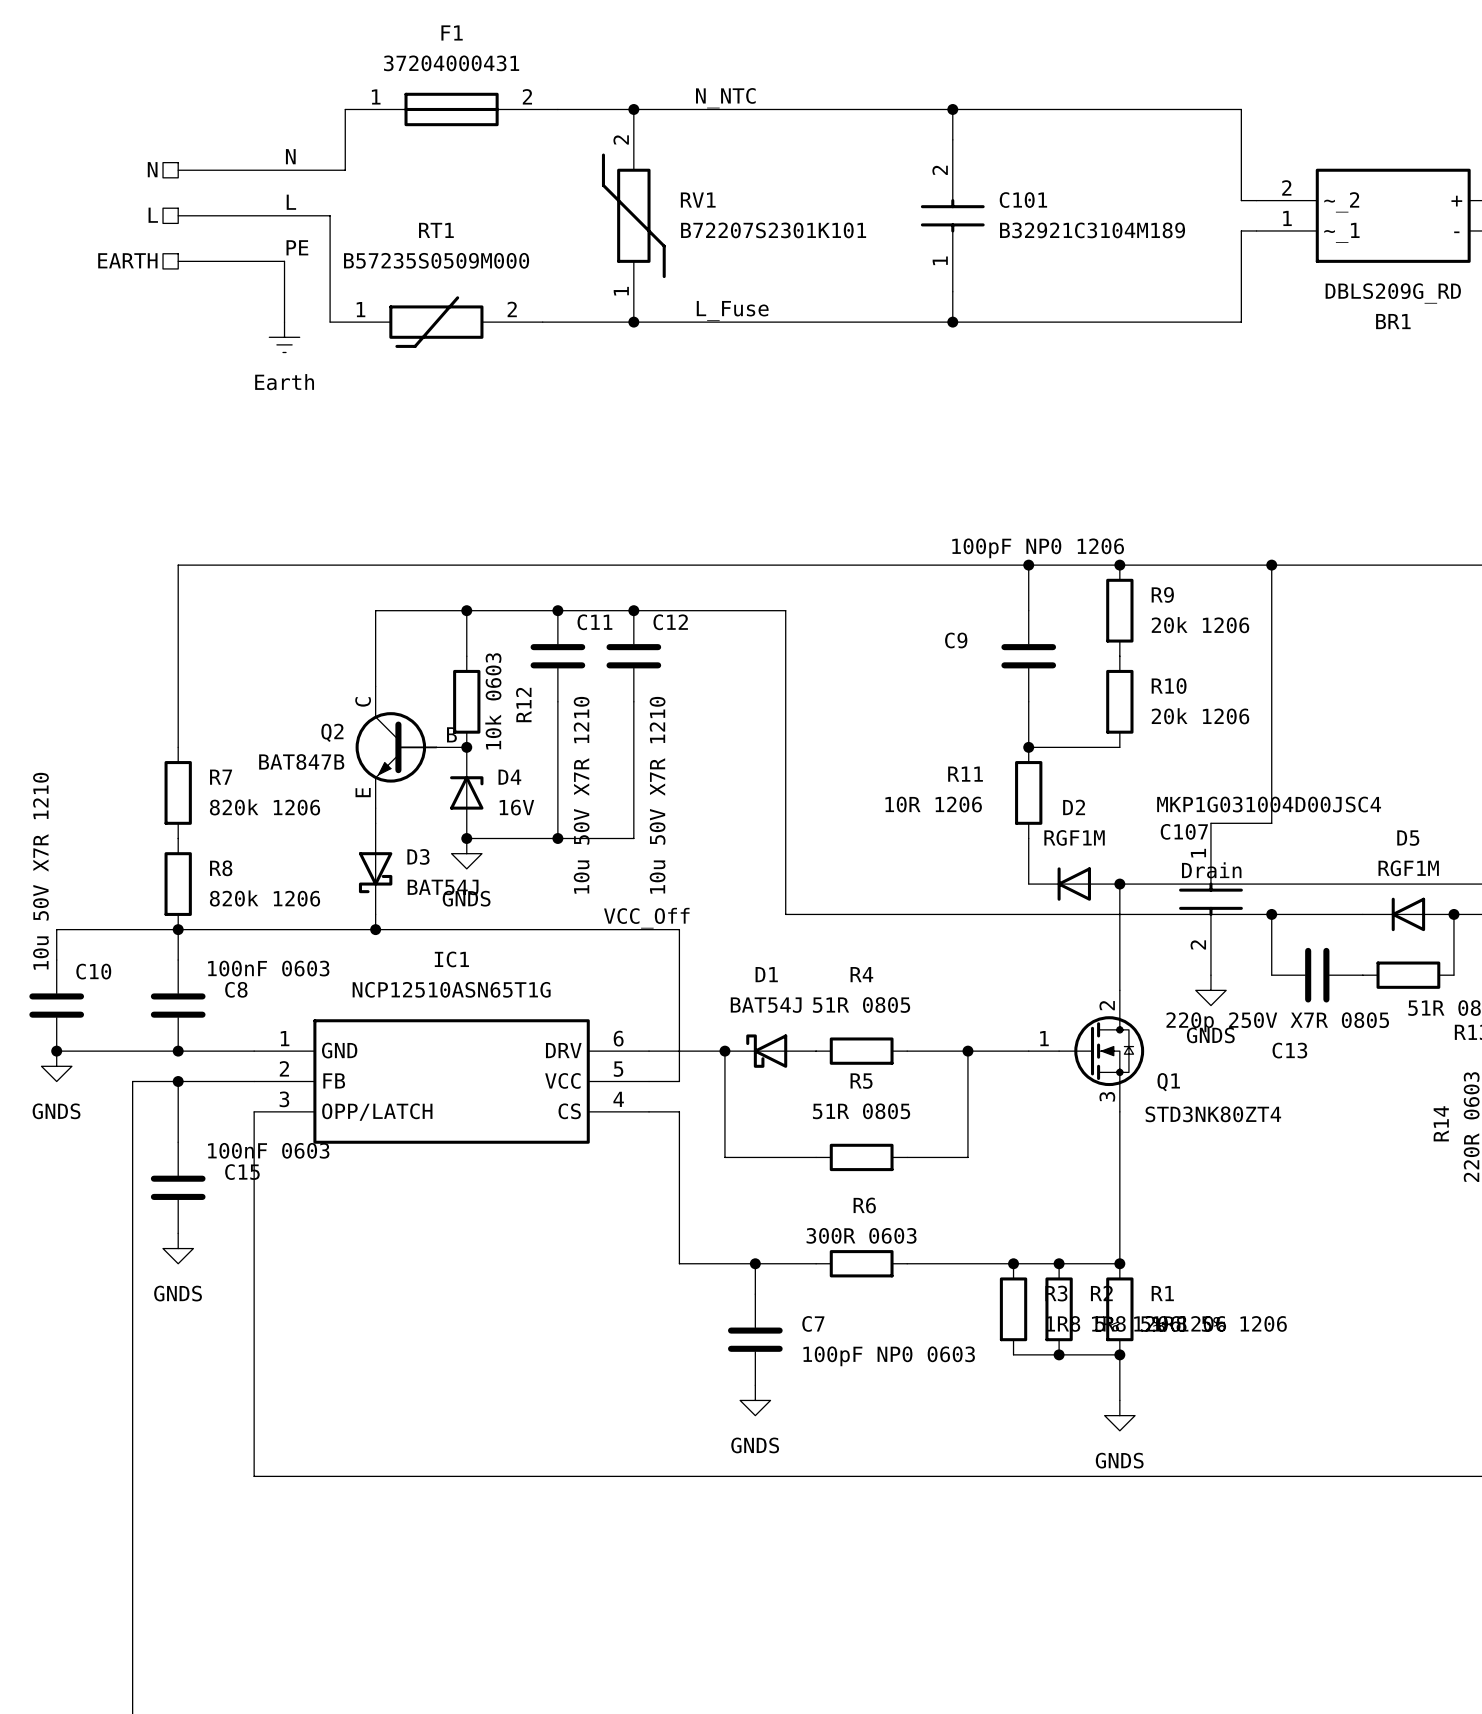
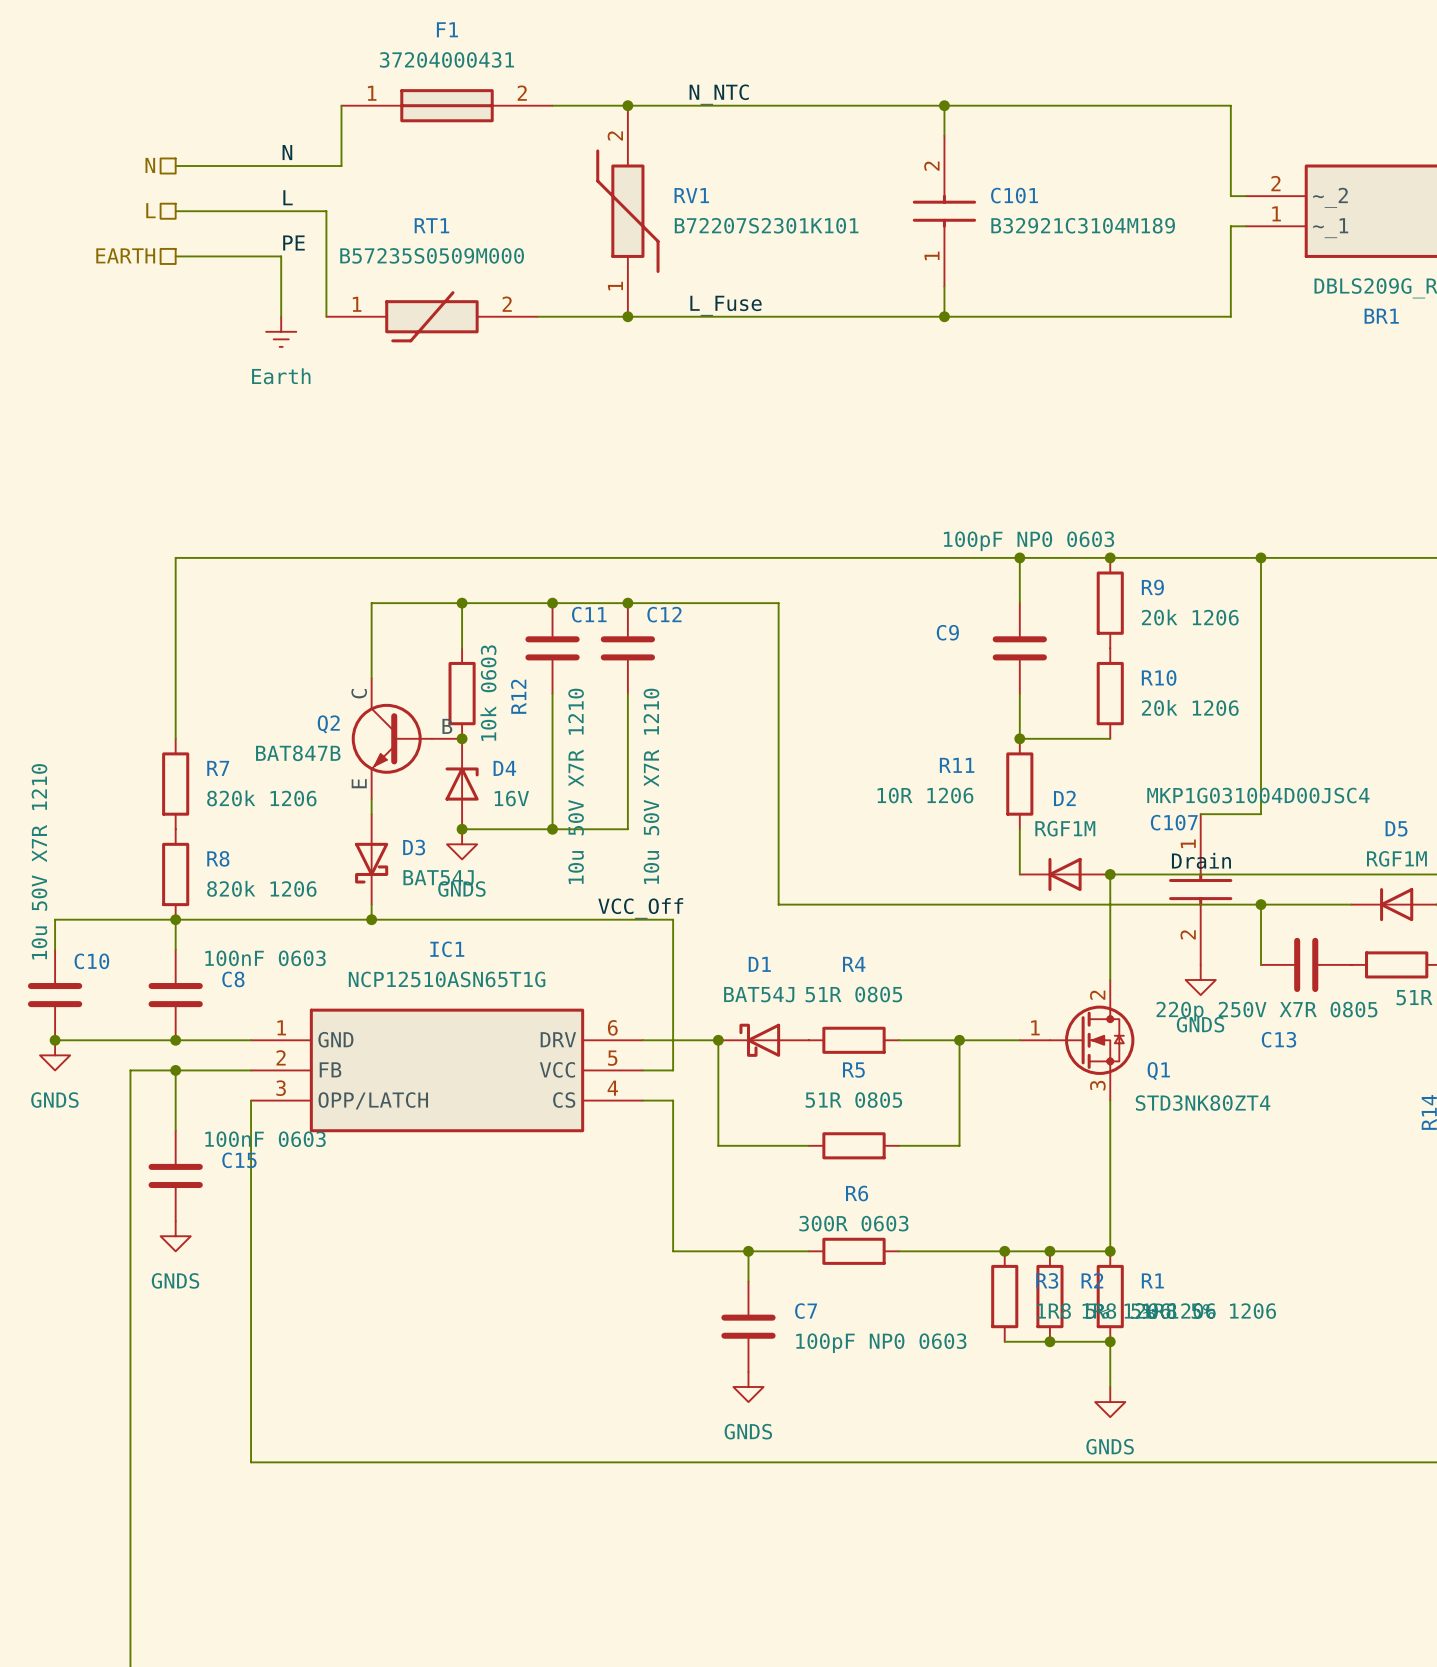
C9 value: 100pF NP0 1206 (1038, 548) -> 100pF NP0 0603 (1029, 541)

